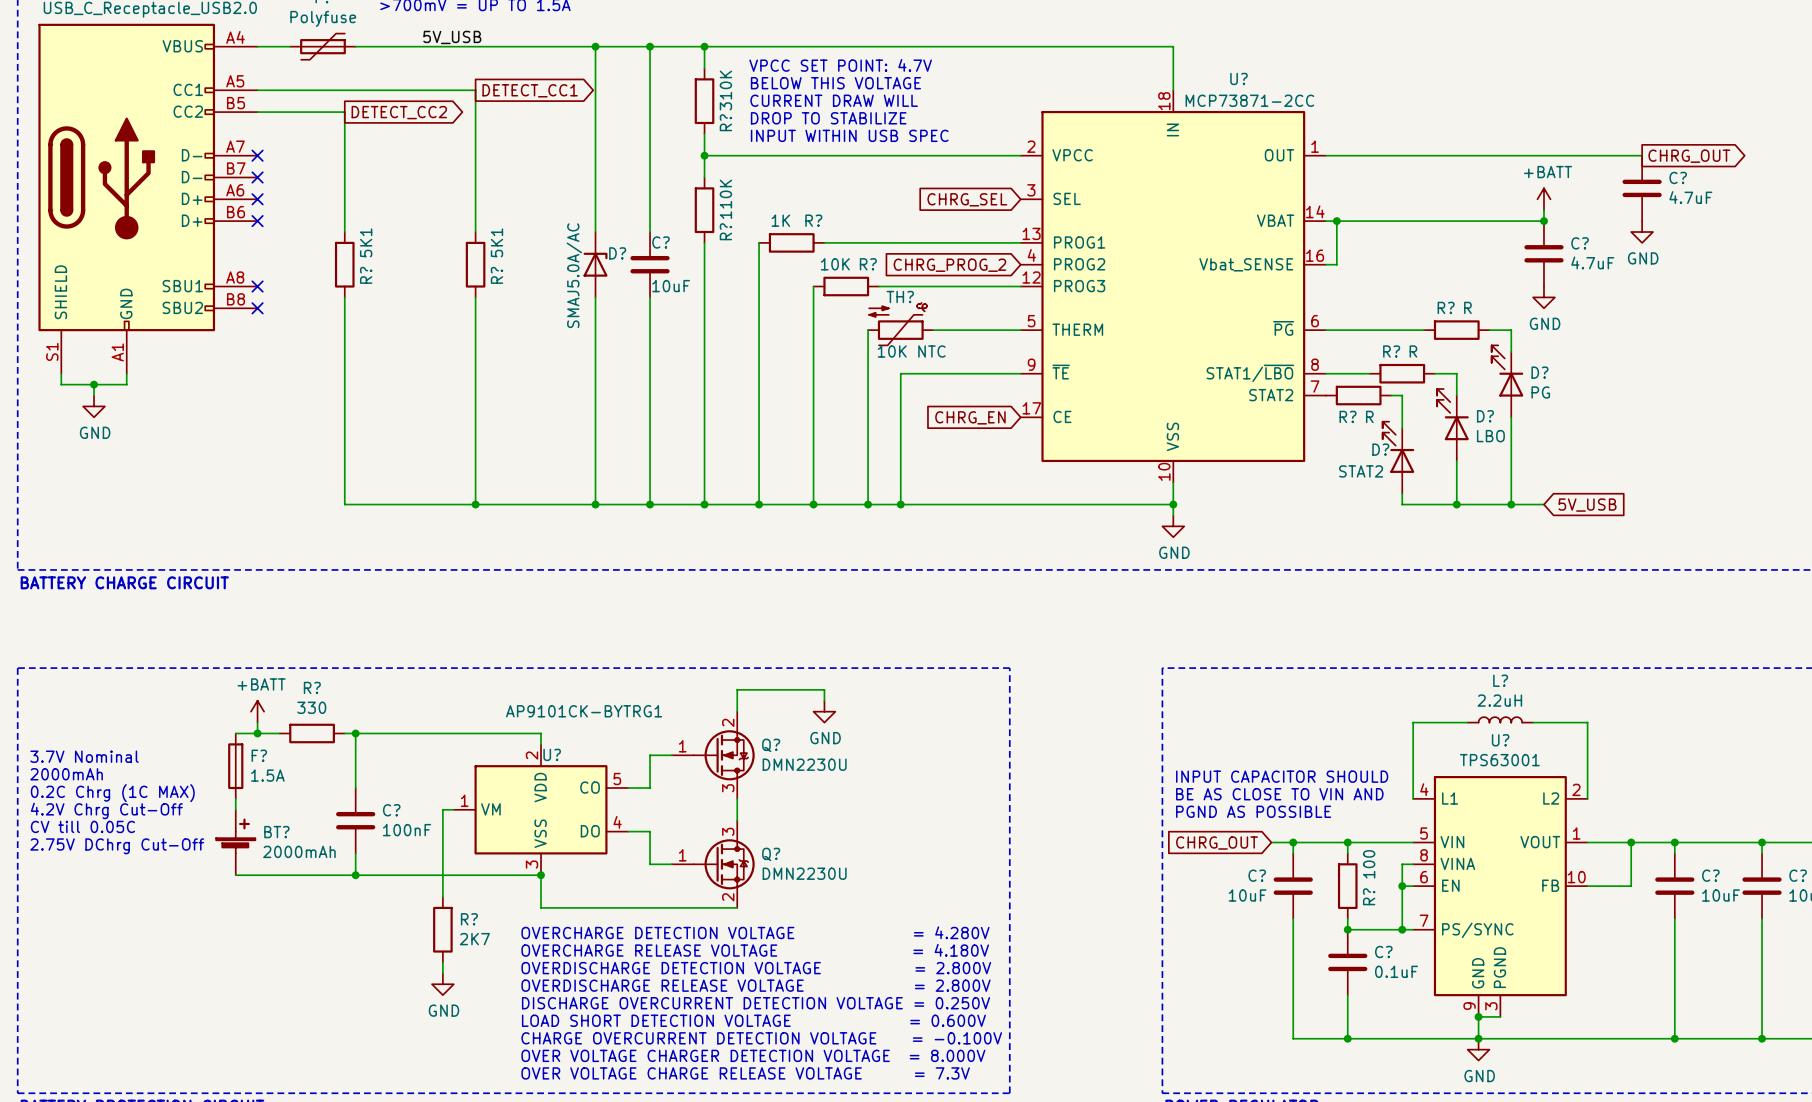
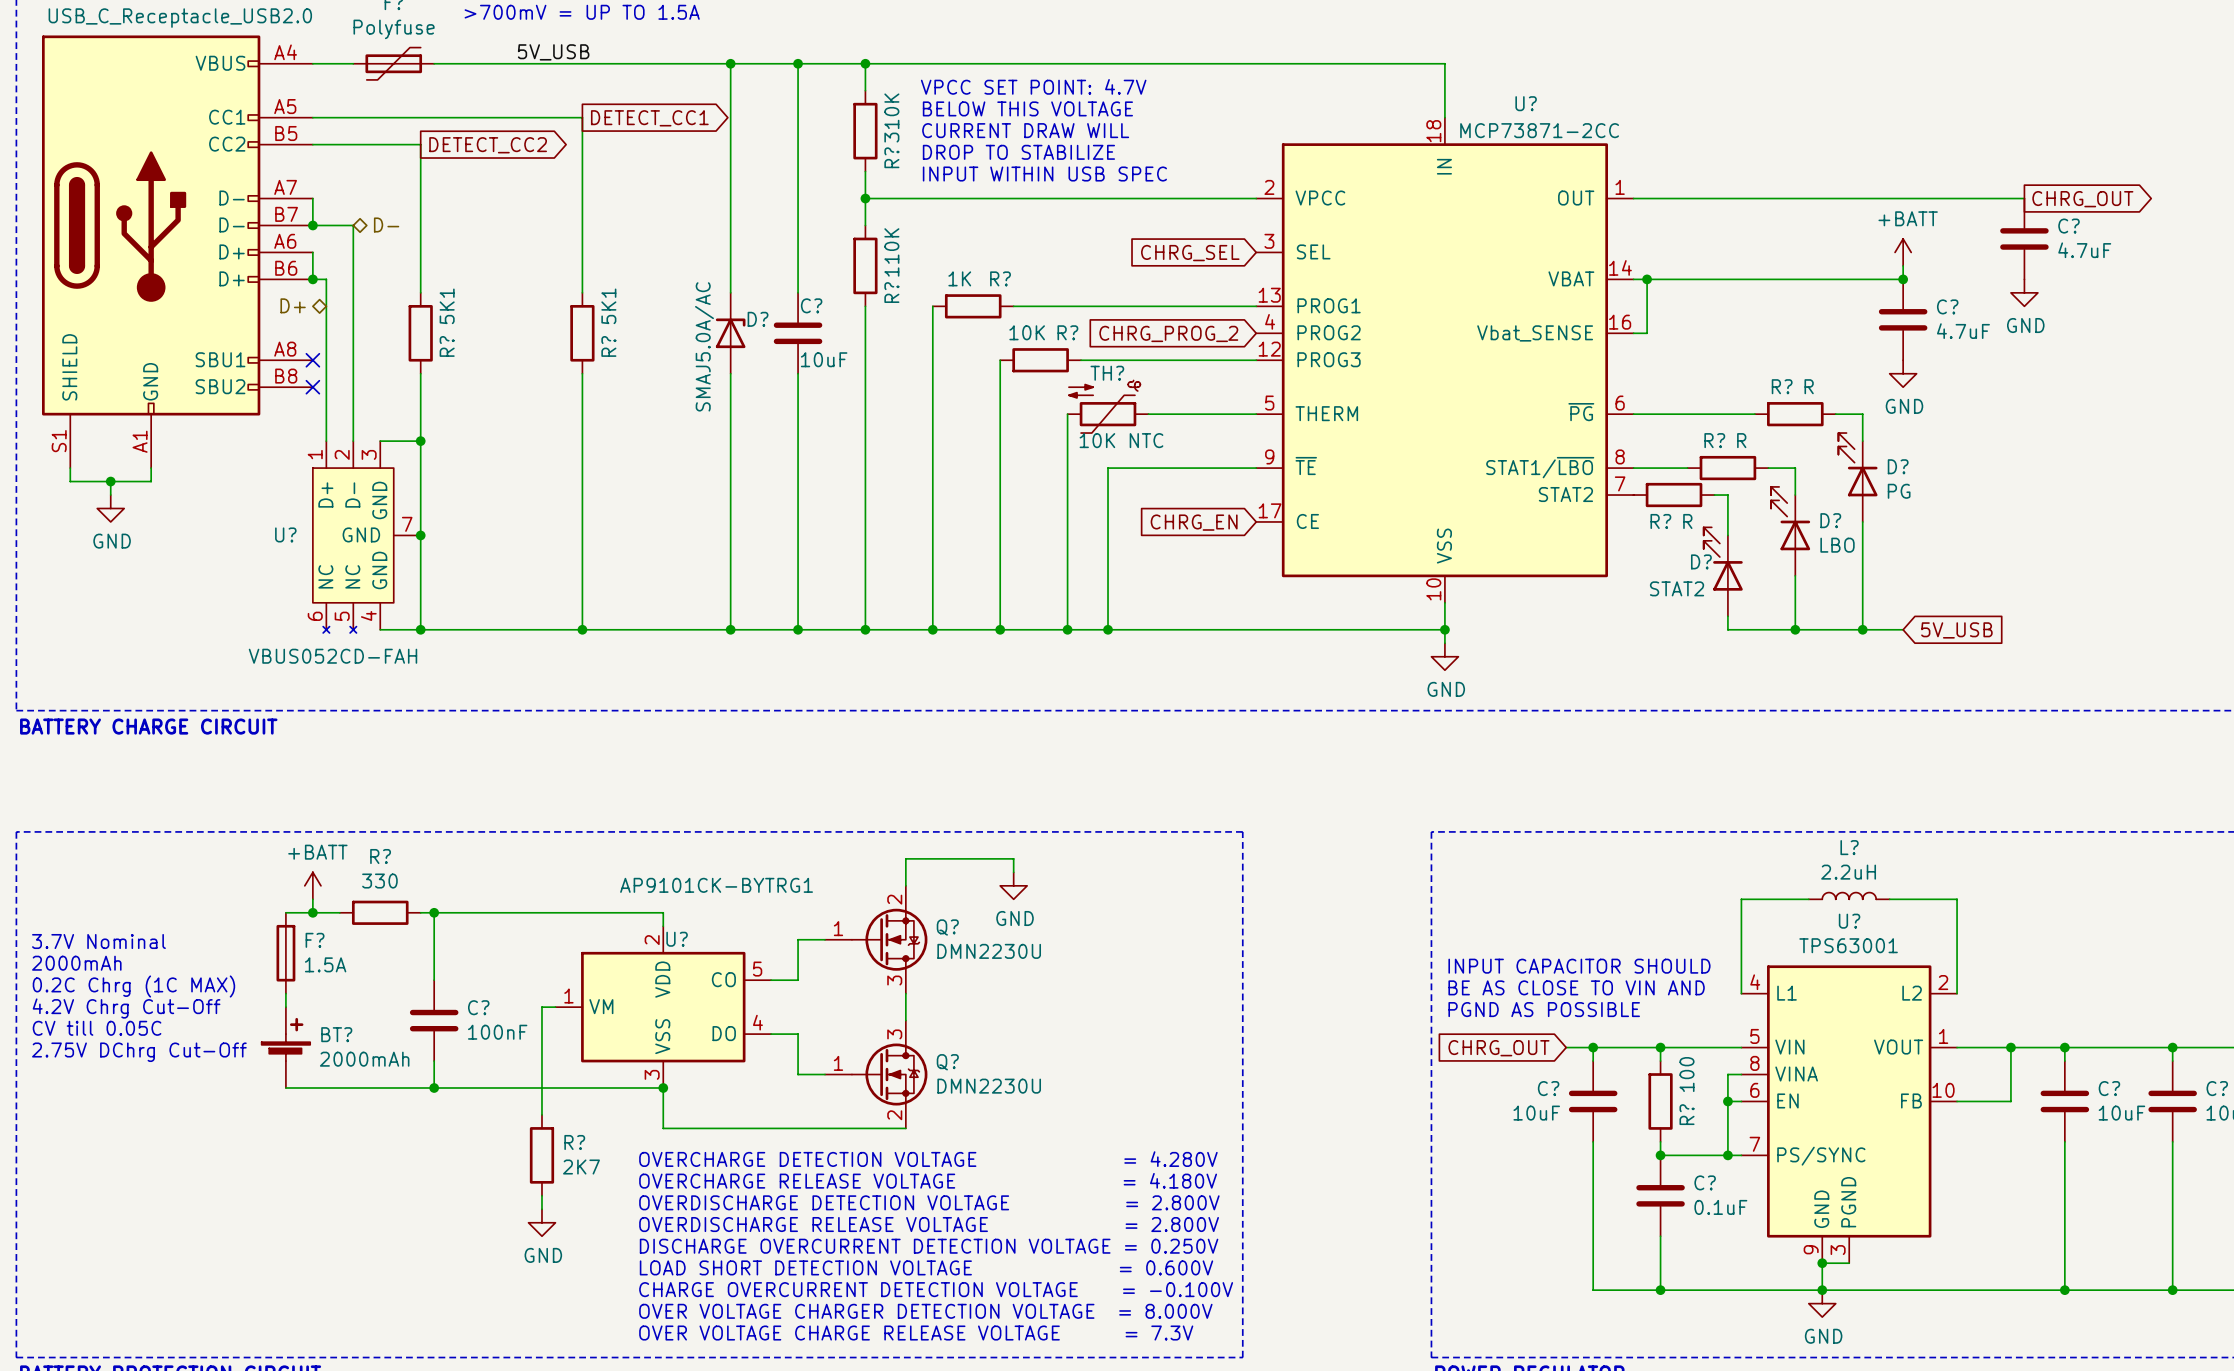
wire: none -> (312, 198) (312, 225) (353, 225) (353, 441)
no-connect mark: (257, 155) -> none
no-connect mark: (257, 177) -> none
junction: none -> (312, 225)
hierarchical label: none -> D- (386, 224)
wire: none -> (312, 252) (312, 279) (326, 279) (326, 441)
no-connect mark: (257, 199) -> none
no-connect mark: (257, 221) -> none
junction: none -> (312, 279)
hierarchical label: none -> D+ (293, 305)
wire: none -> (380, 441) (420, 441)
junction: none -> (420, 441)
junction: none -> (420, 535)
U?: none -> VBUS052CD-FAH (366, 537)
wire: none -> (380, 629) (420, 629)
junction: none -> (420, 629)

